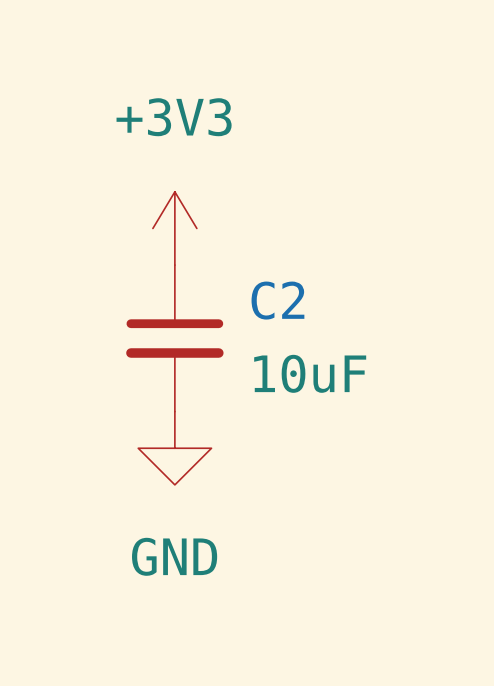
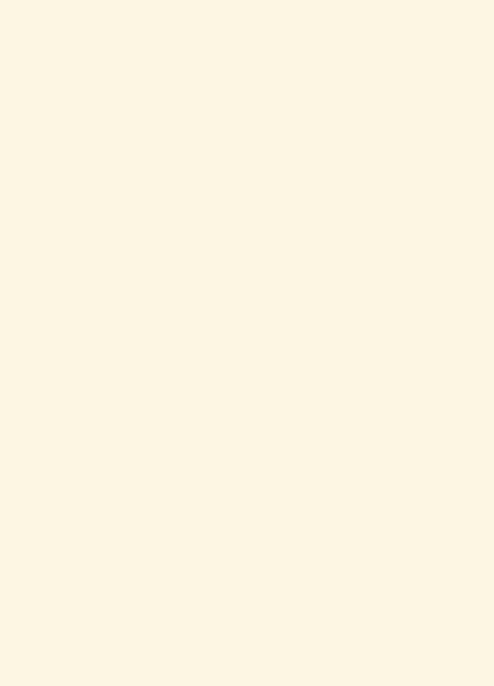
power symbol: +3V3 (174, 228) -> none
C2: 10uF (174, 338) -> none
power symbol: GND (174, 448) -> none

